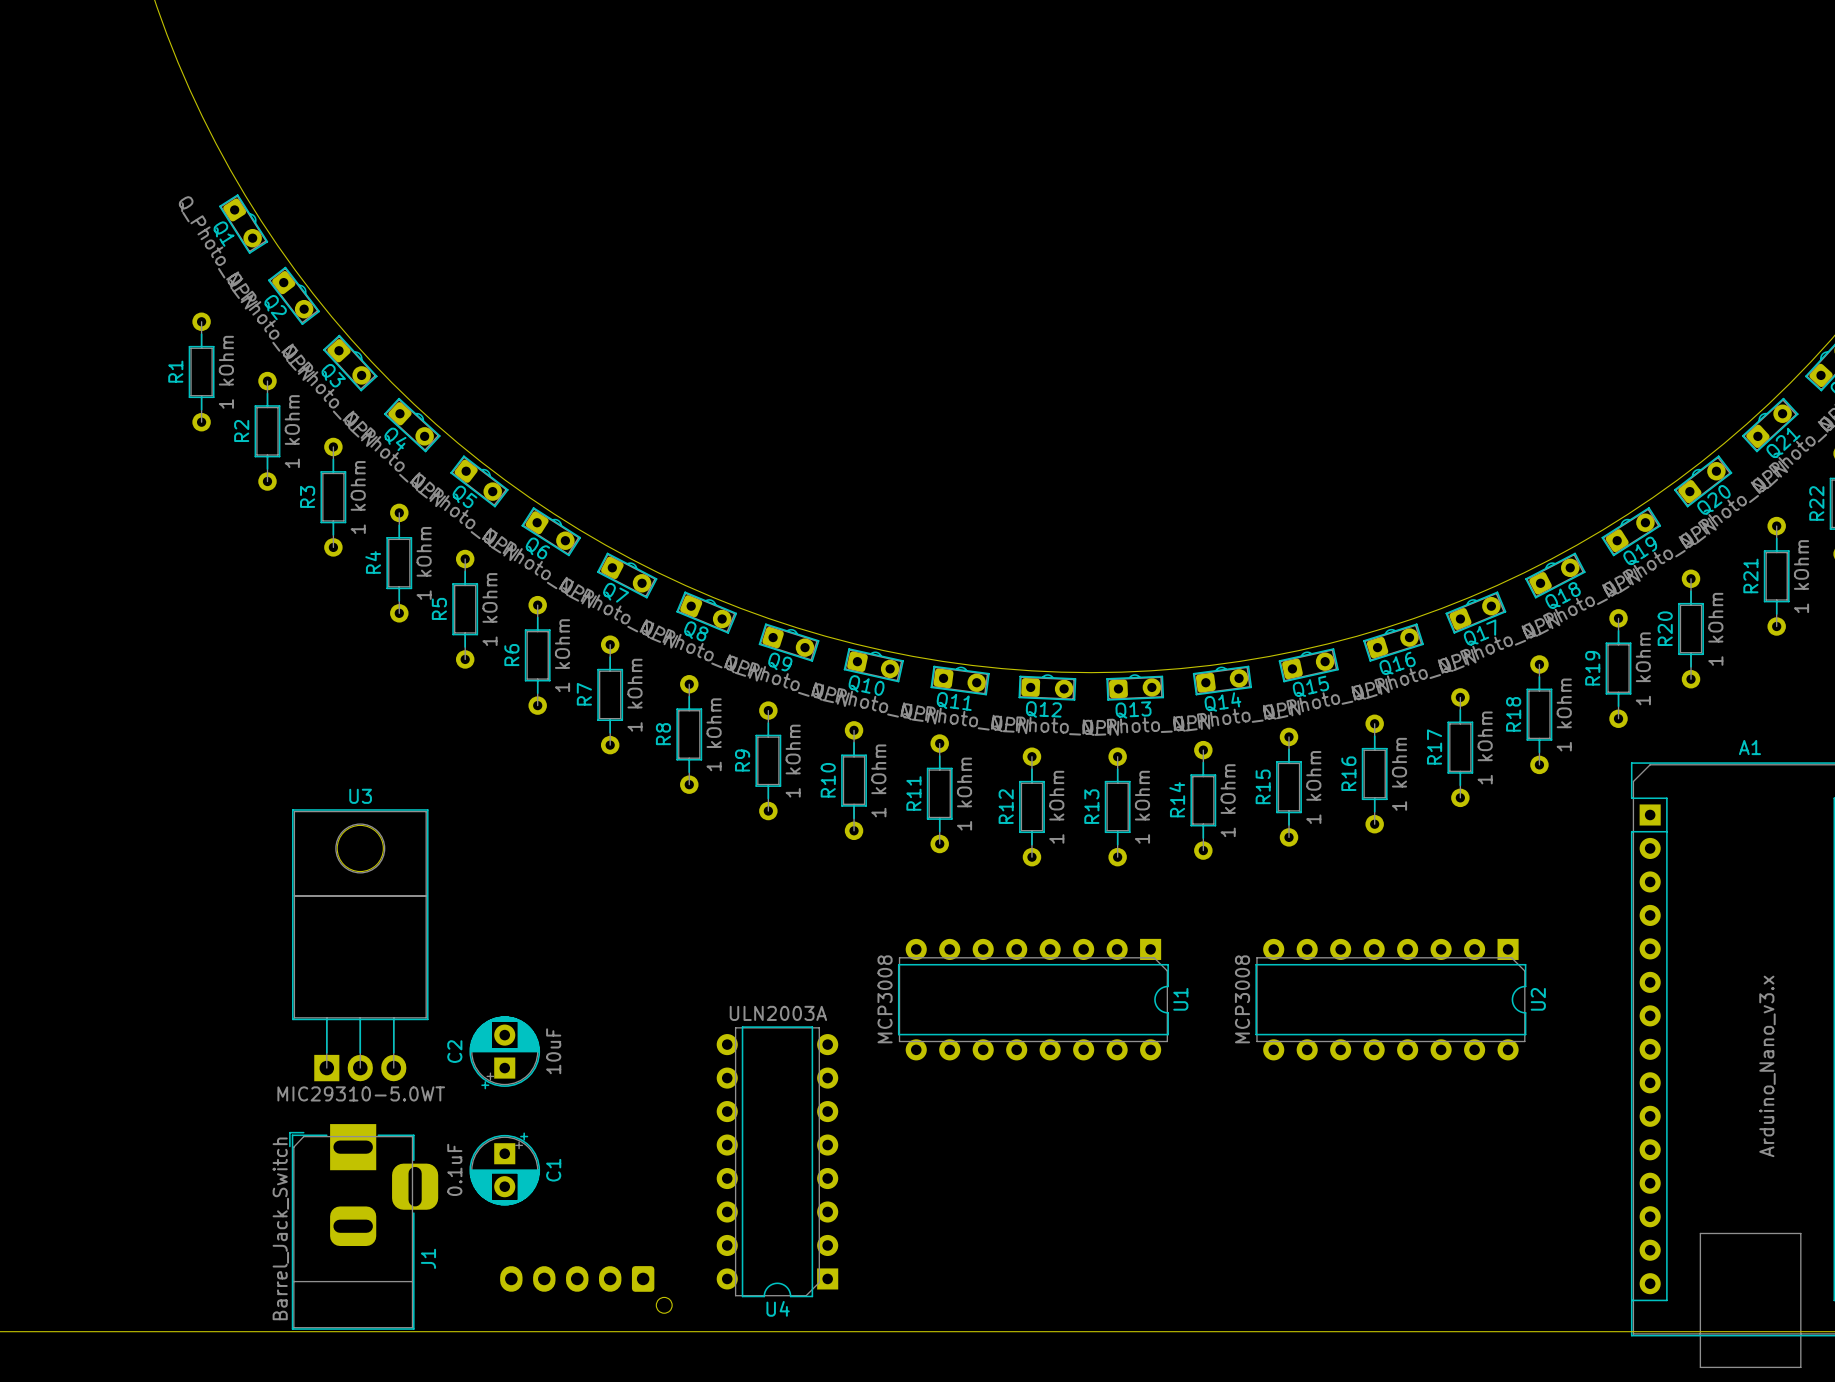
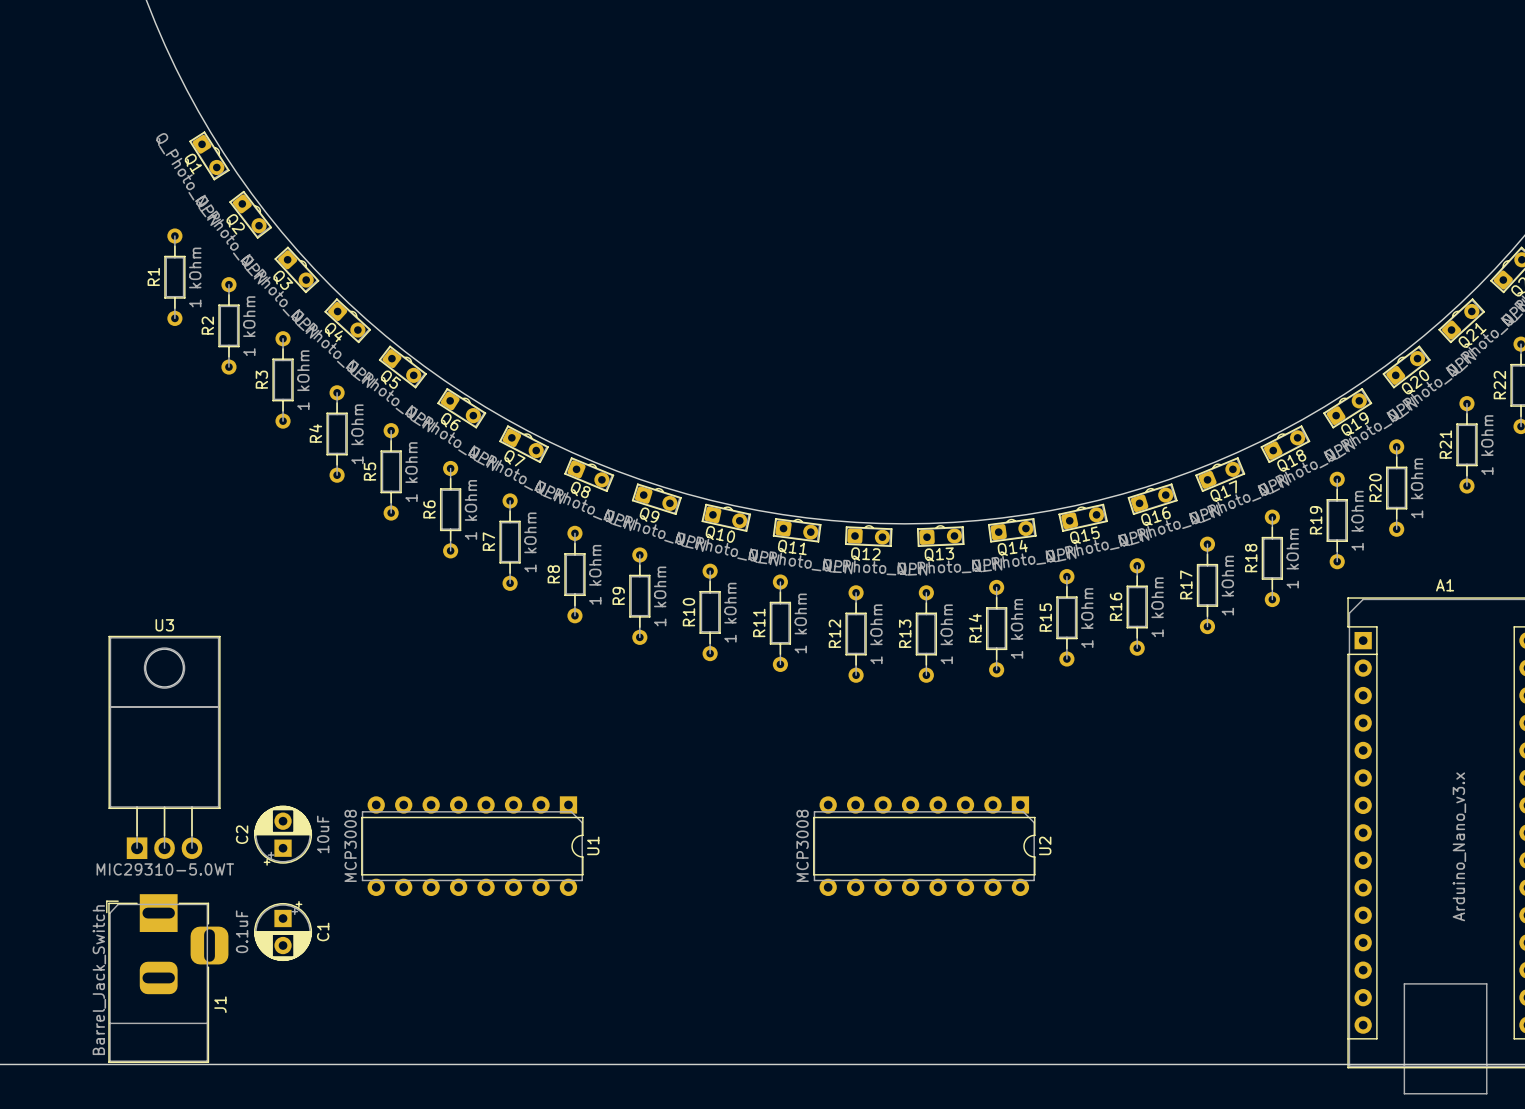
U3 position: (360, 945) -> (164, 747)
U1 position: (1033, 999) -> (472, 846)
U2 position: (1390, 999) -> (924, 846)
C2 position: (504, 1052) -> (283, 835)
U4: ULN2003A (777, 1161) -> none
C1 position: (504, 1168) -> (283, 931)
J1 position: (363, 1226) -> (167, 978)
part: (586, 1289) -> none

